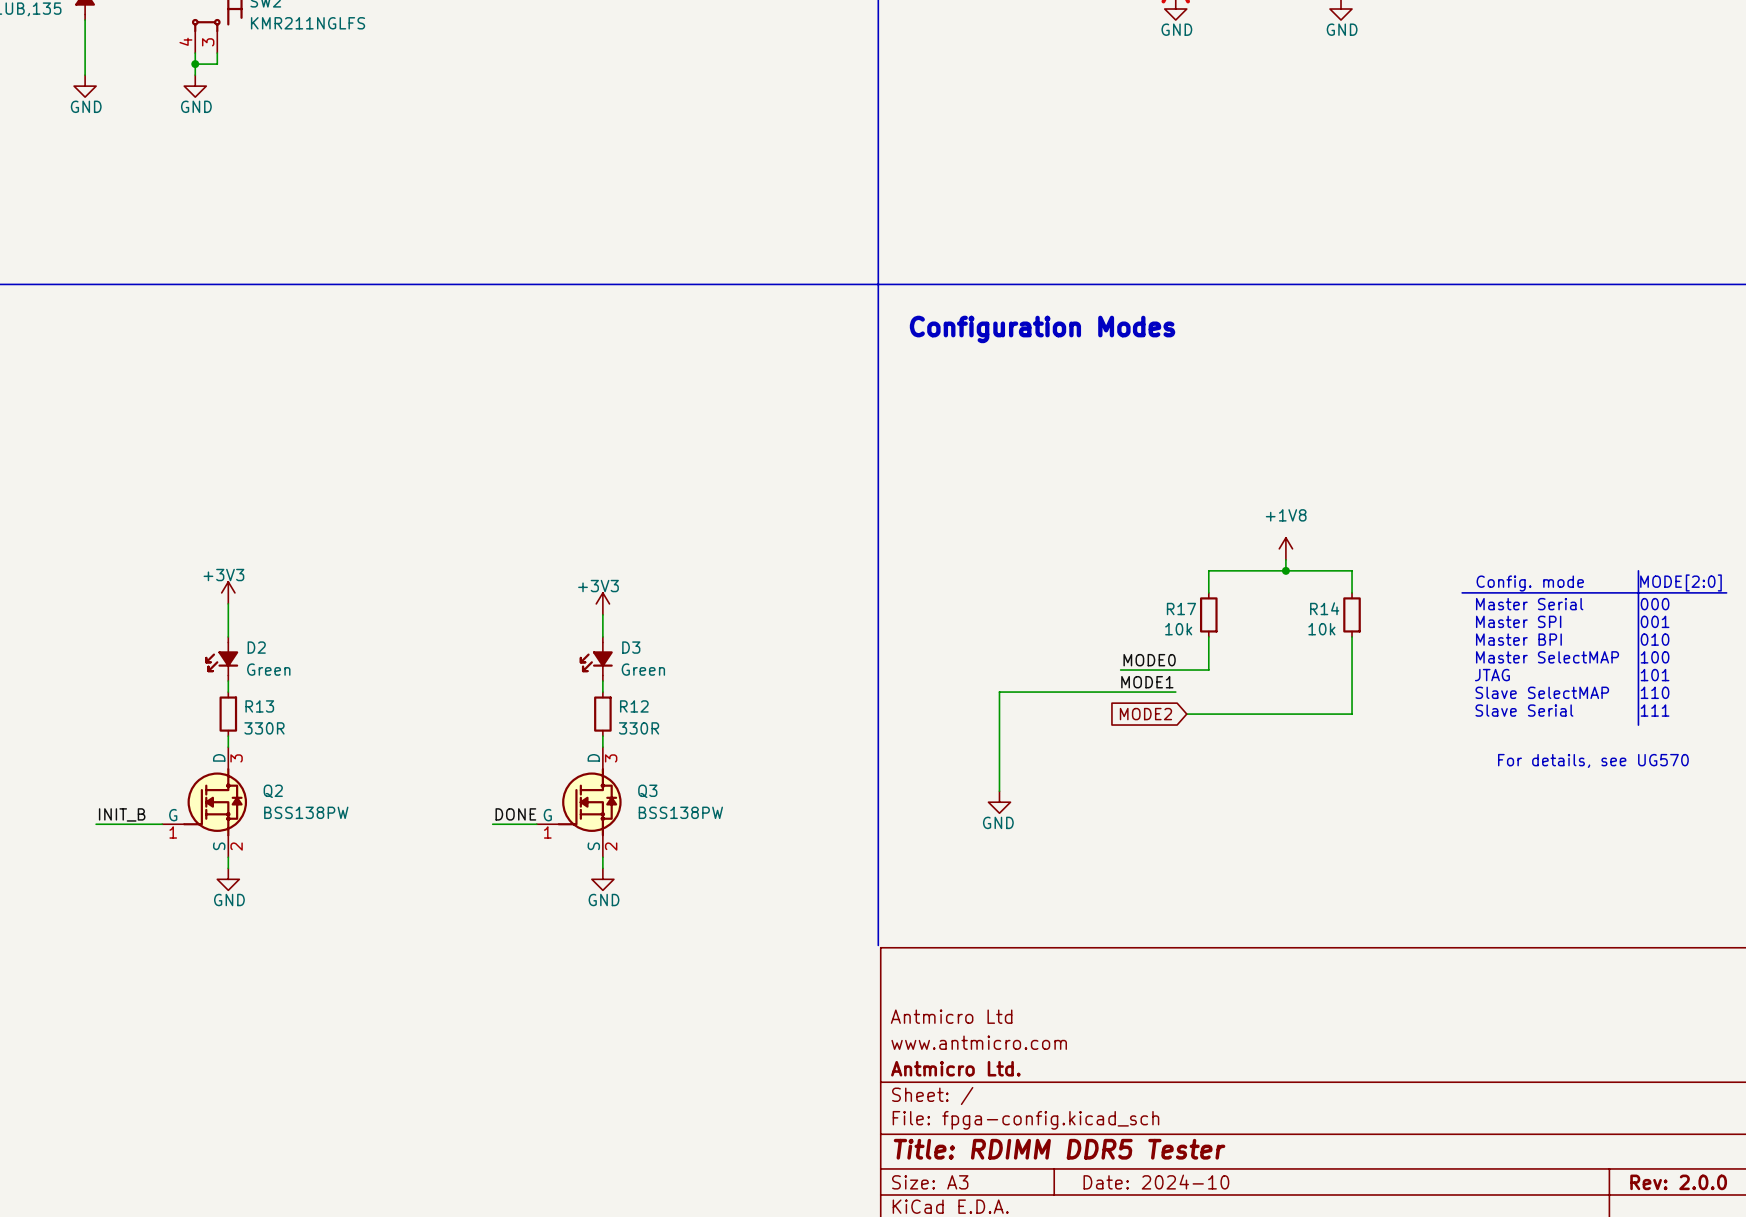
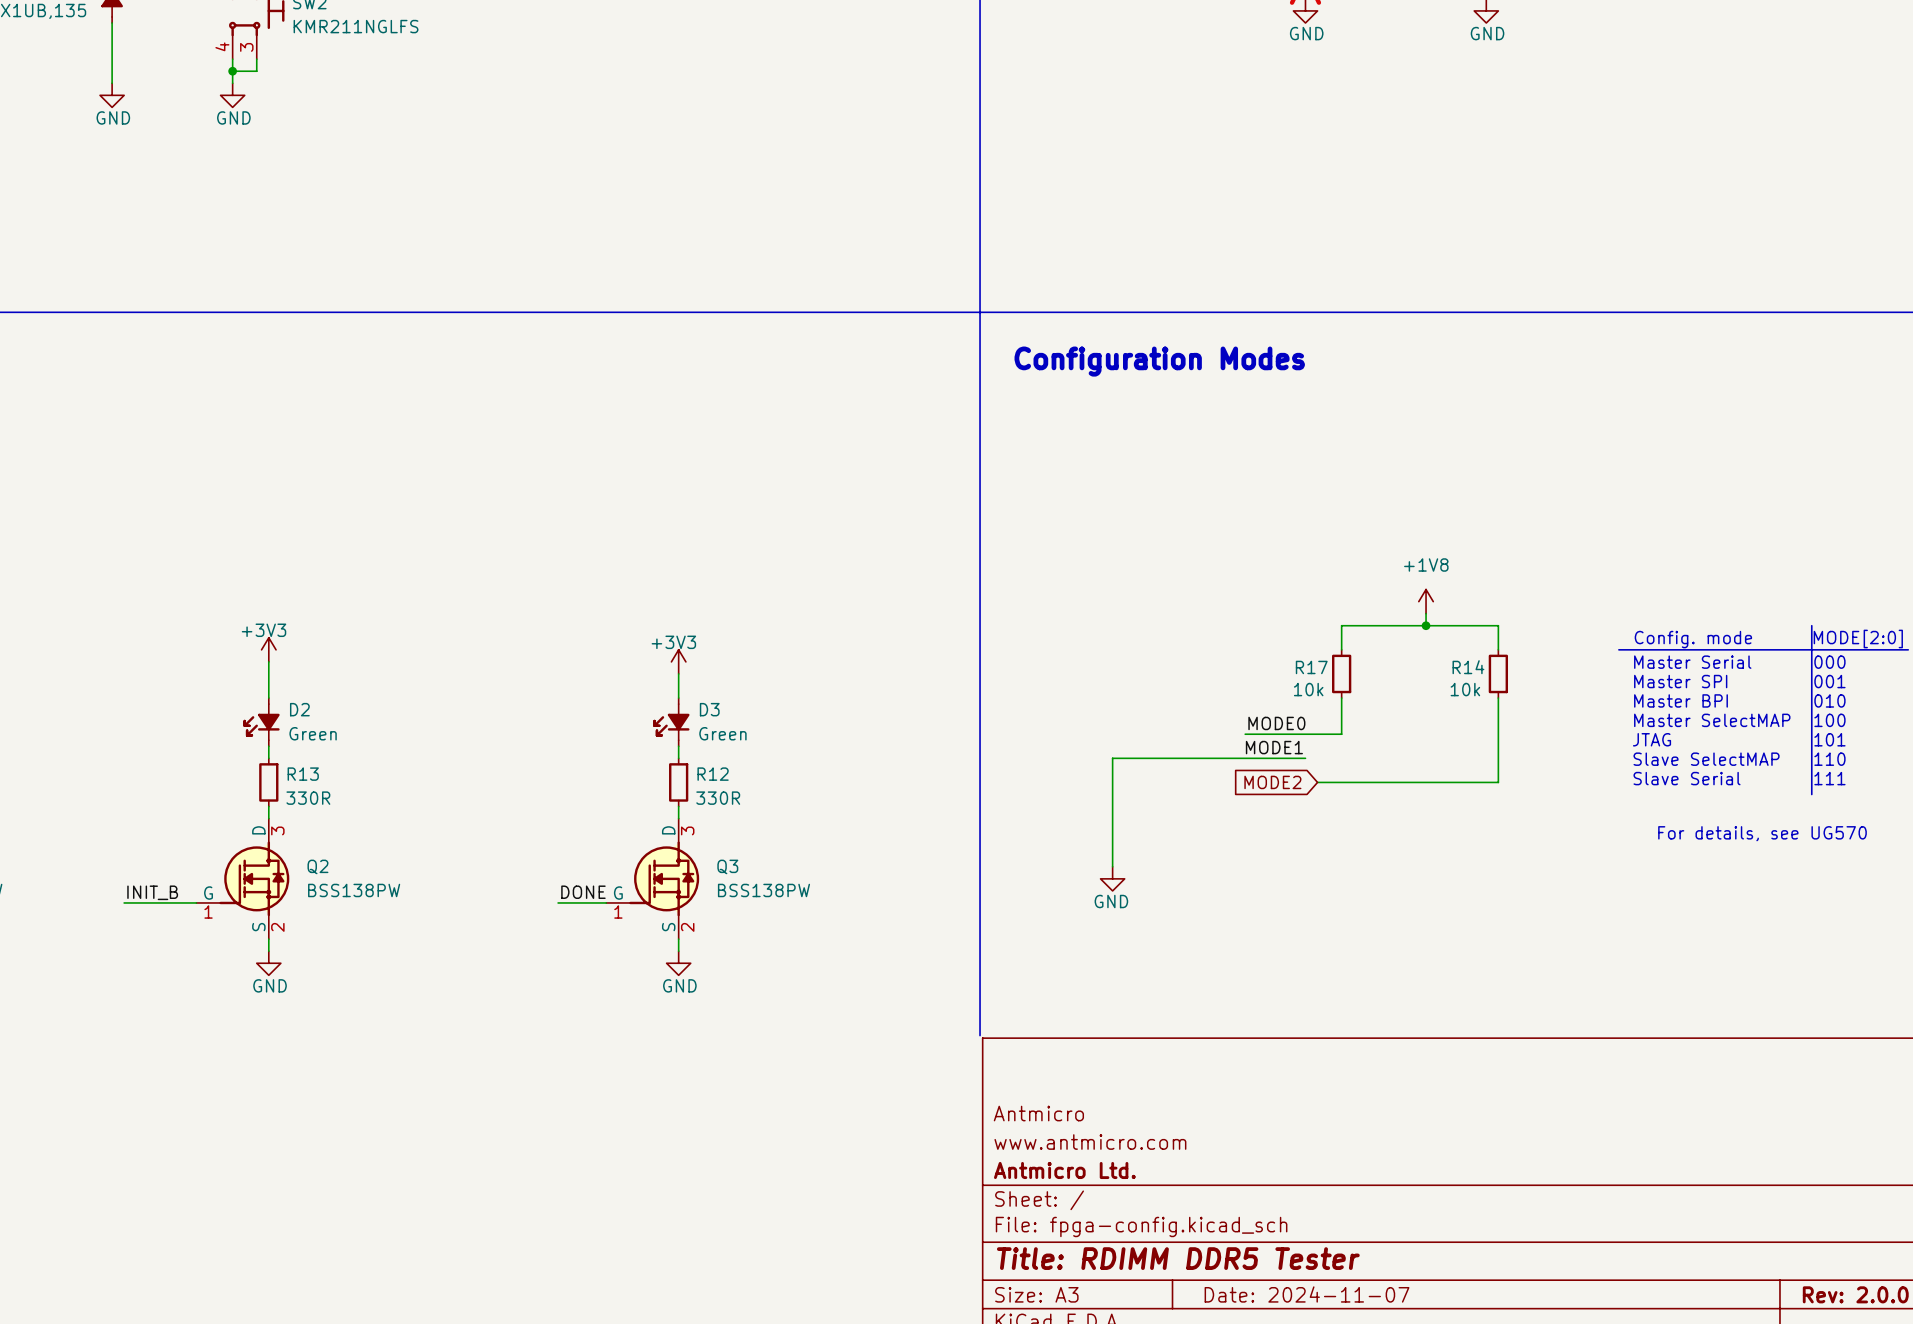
title block: Antmicro Ltd (951, 1016) -> Antmicro (1038, 1113)
title block: Date: 2024-10 (1156, 1182) -> Date: 2024-11-07 (1307, 1294)

